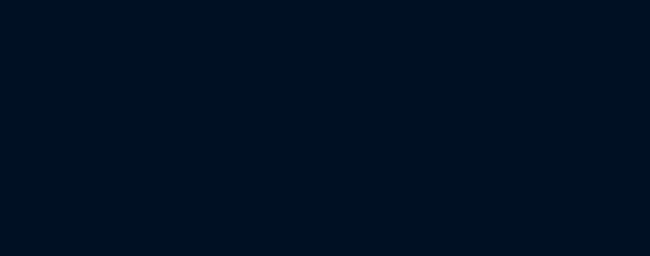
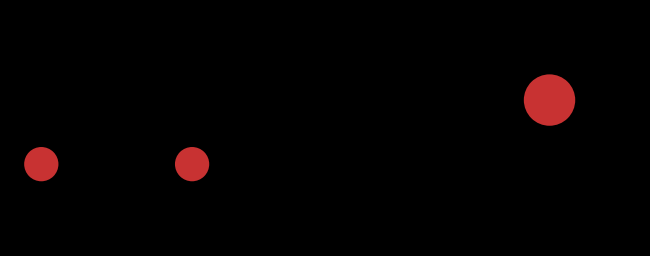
part: none -> (549, 100)
part: none -> (41, 164)
part: none -> (192, 164)

